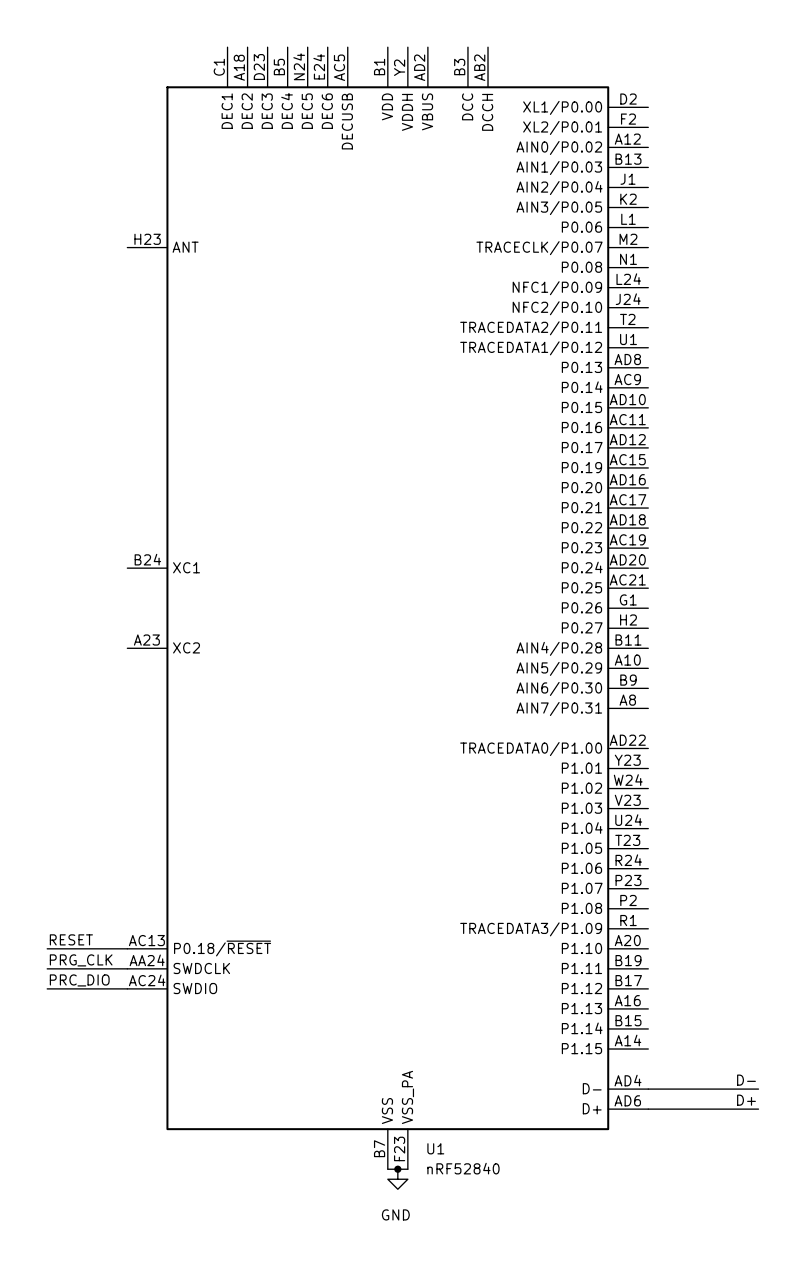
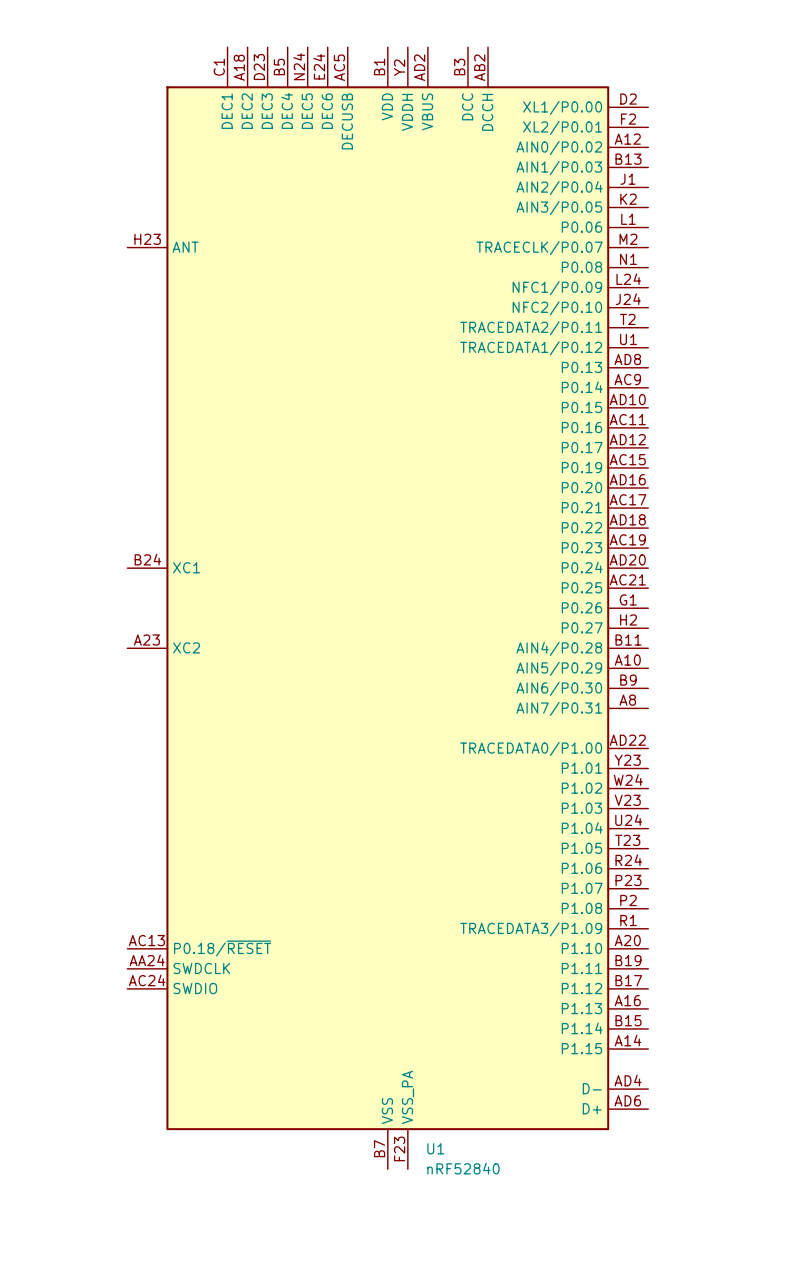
label: RESET (71, 939) -> none
wire: (47, 948) (127, 948) -> none
label: PRG_CLK (81, 960) -> none
wire: (47, 968) (127, 968) -> none
label: PRC_DIO (79, 980) -> none
wire: (47, 988) (127, 988) -> none
label: D- (746, 1080) -> none
wire: (648, 1089) (758, 1089) -> none
label: D+ (746, 1100) -> none
wire: (648, 1109) (758, 1109) -> none
wire: (387, 1169) (407, 1169) -> none
junction: (397, 1169) -> none
power symbol: GND (397, 1179) -> none

